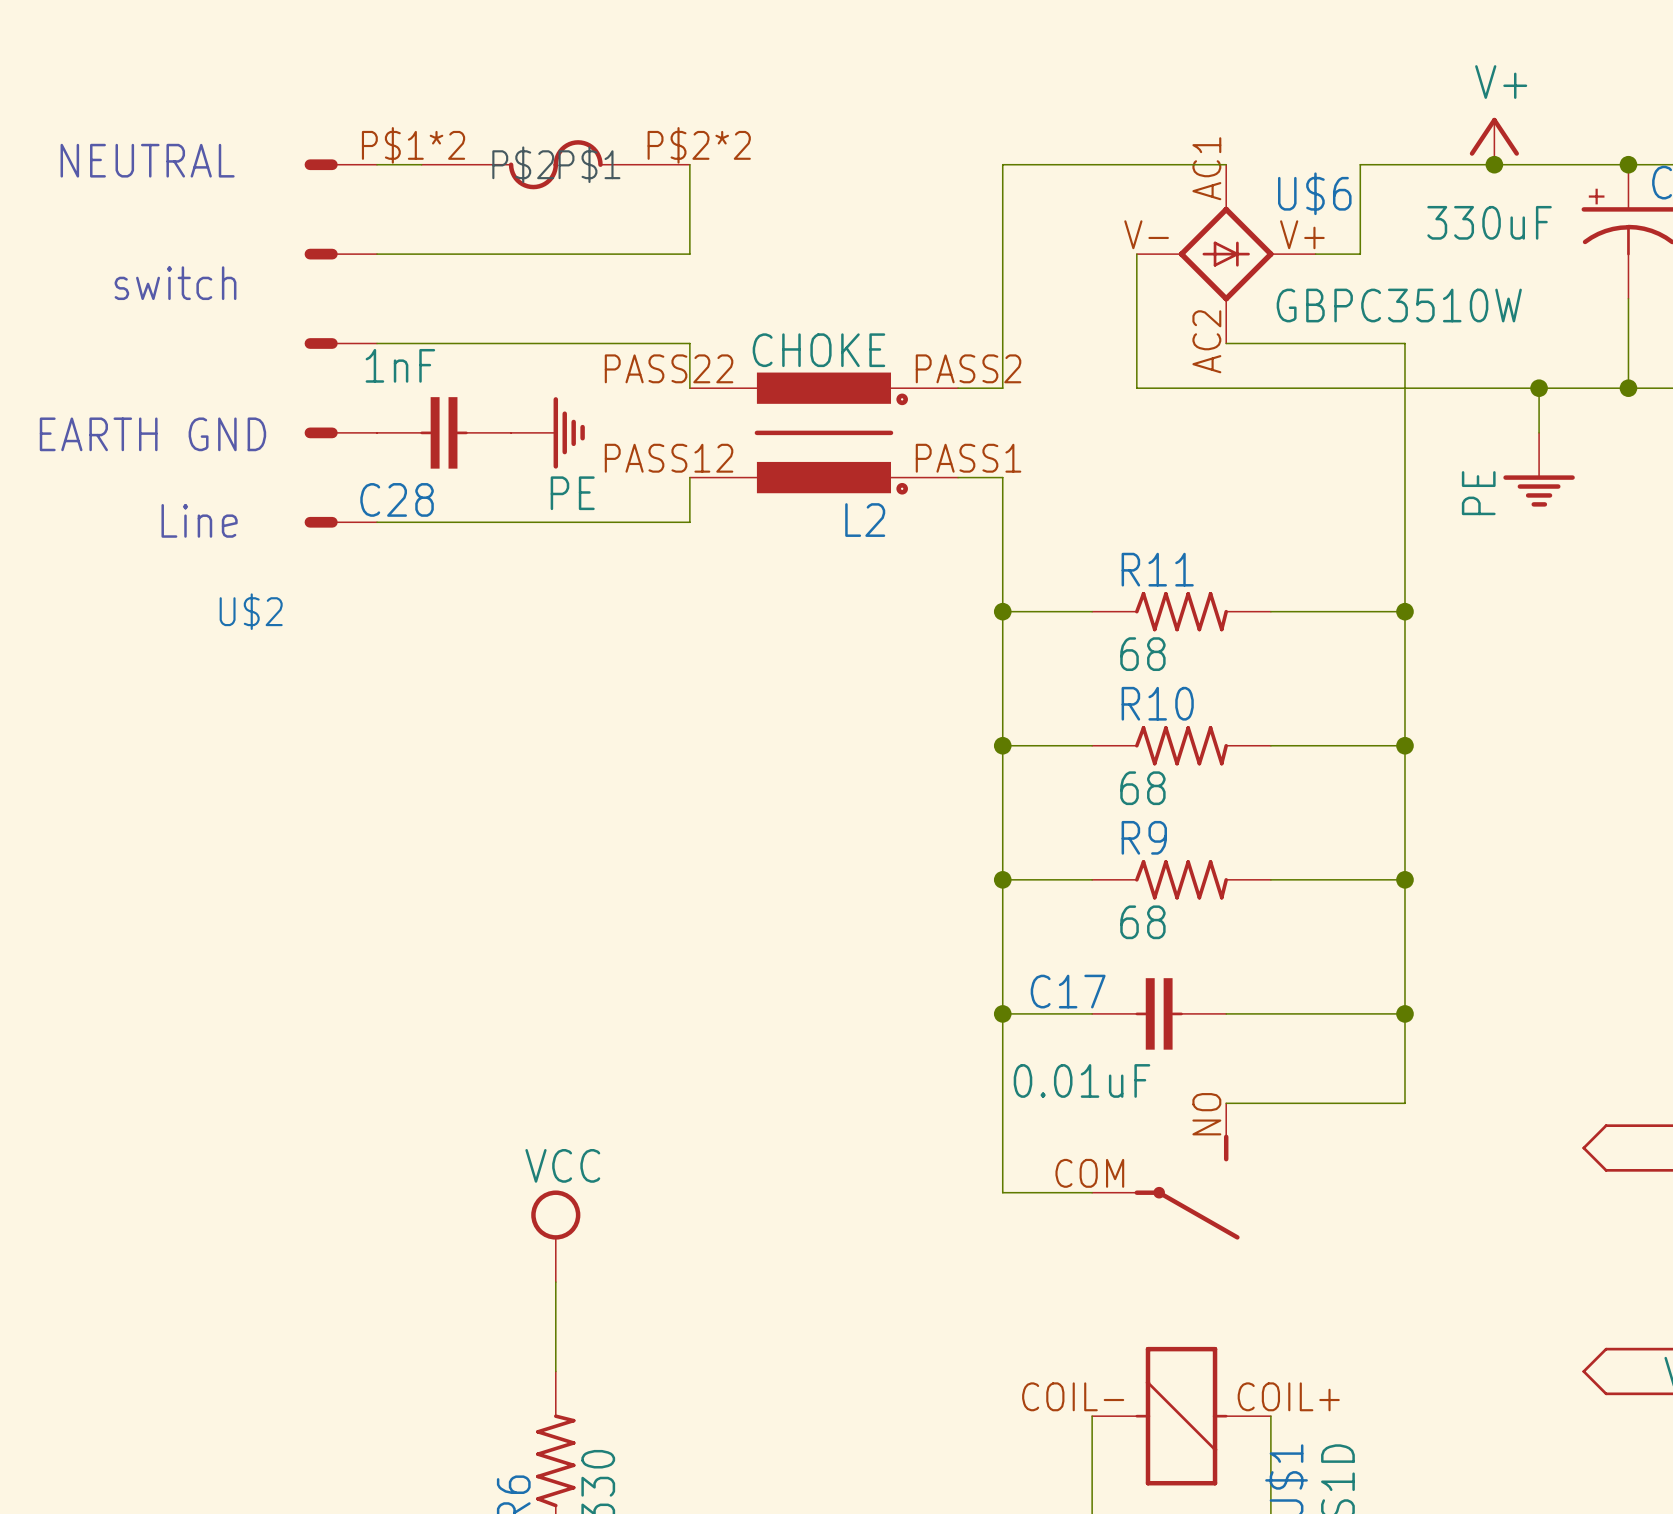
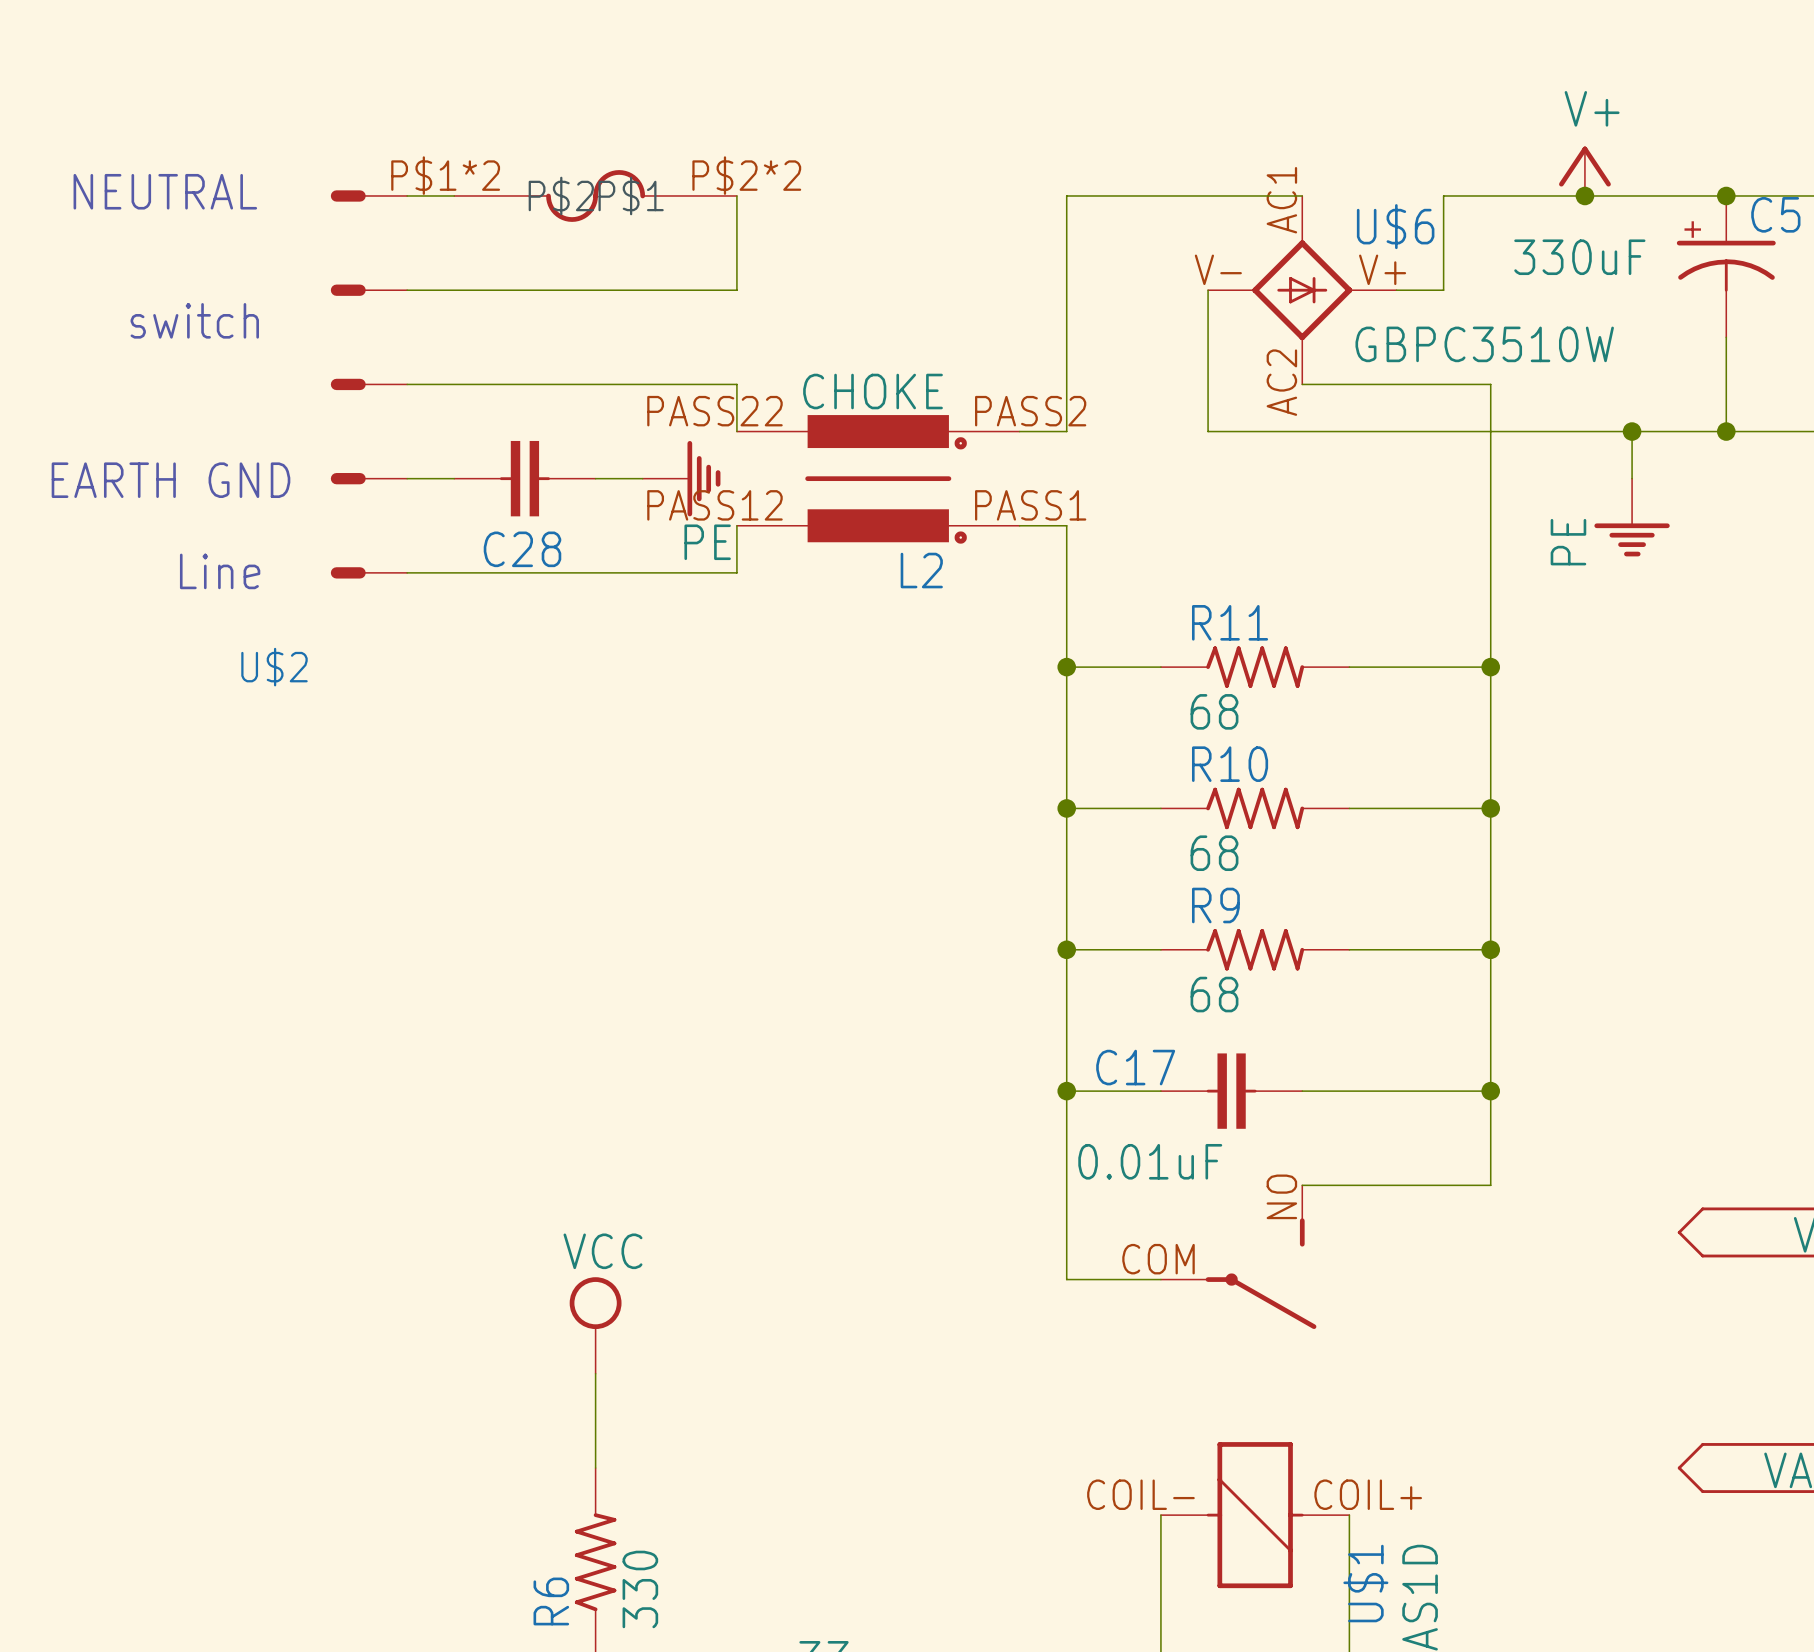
C28 value: 1nF (400, 365) -> none
C28 position: (444, 432) -> (524, 478)
power symbol position: PE (547, 432) -> PE (681, 478)
wire: none -> (595, 478) (642, 478)
C28 name position: C28 (397, 499) -> C28 (522, 549)

